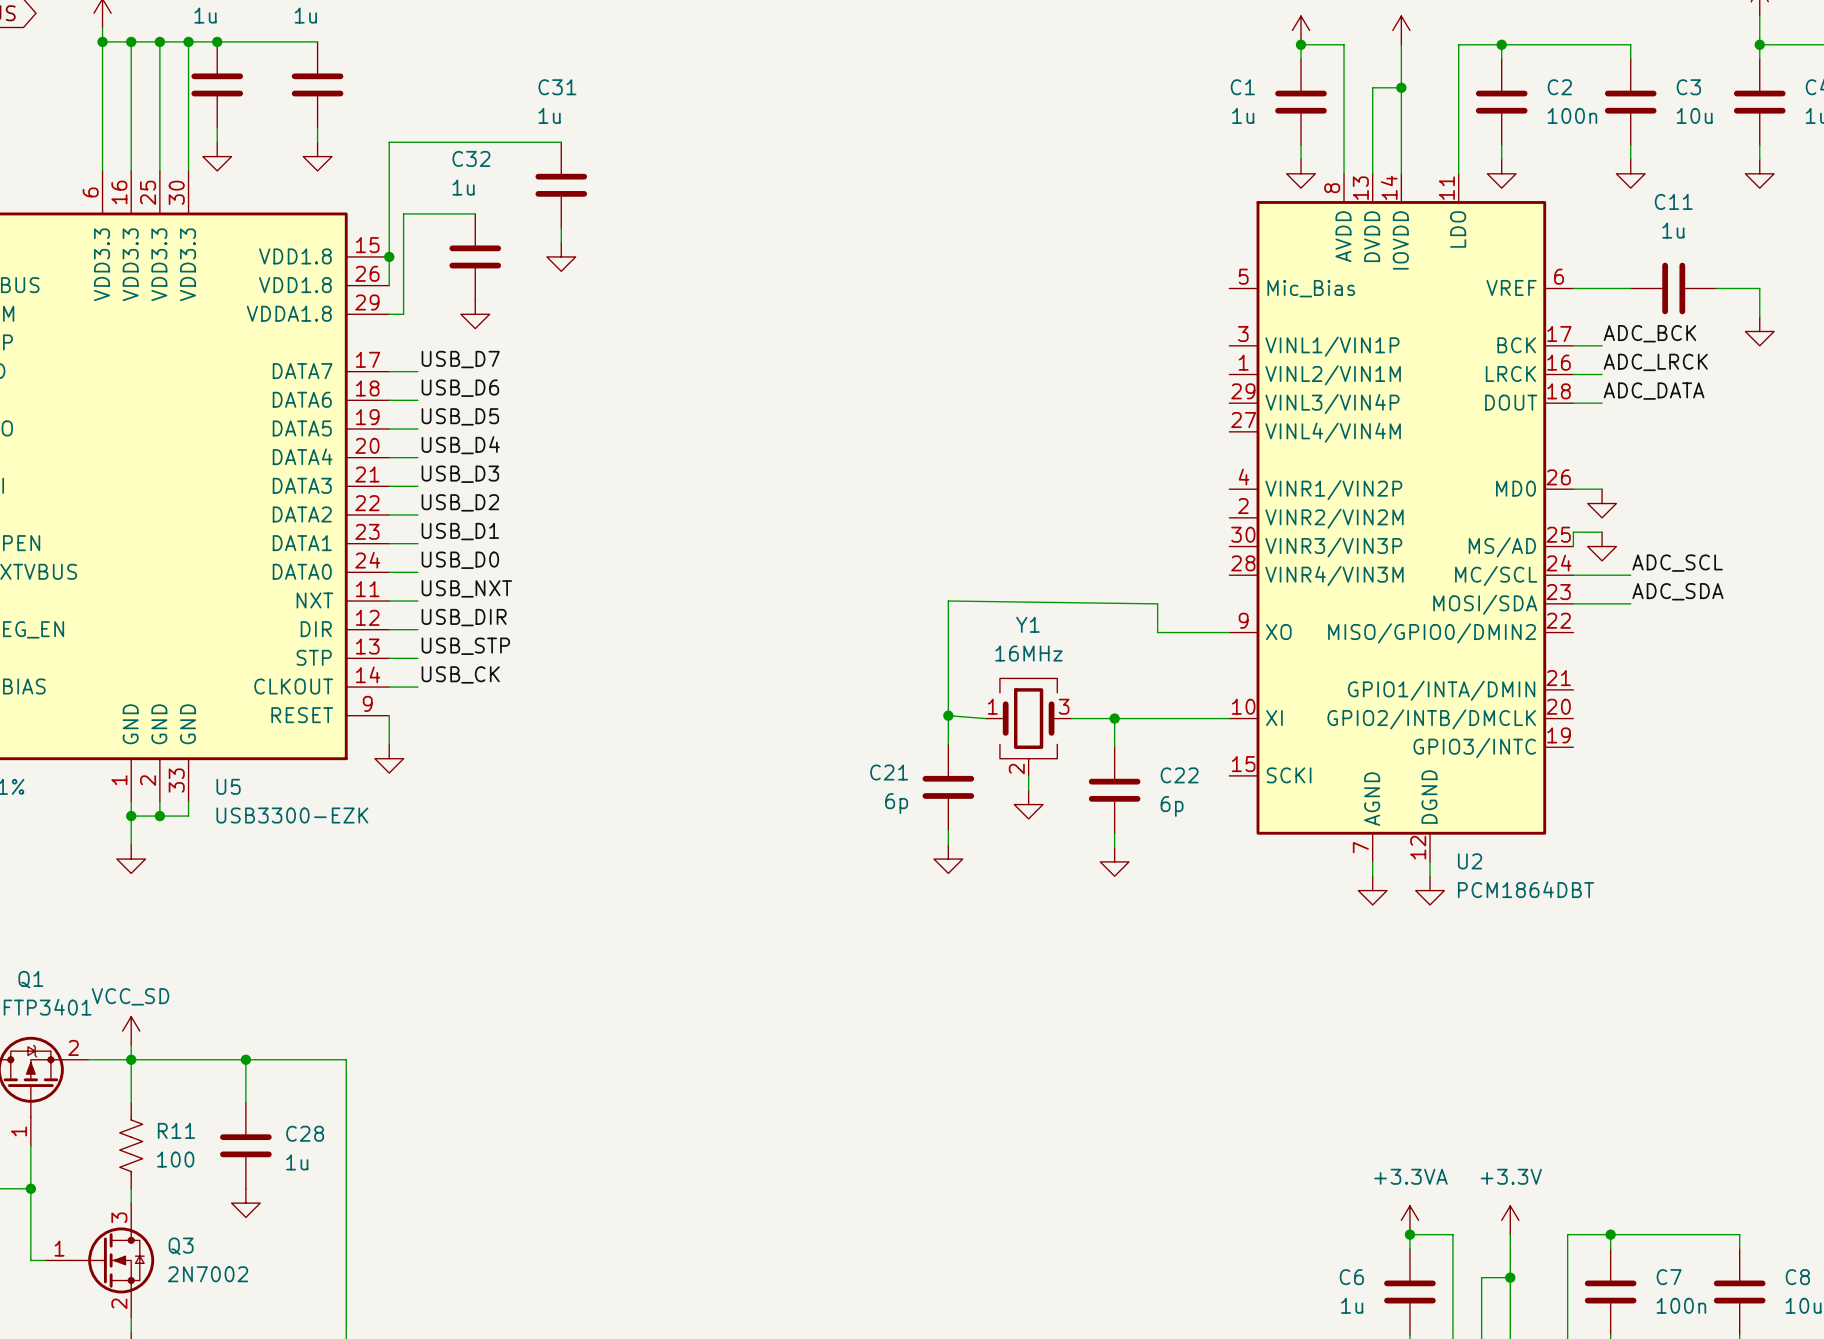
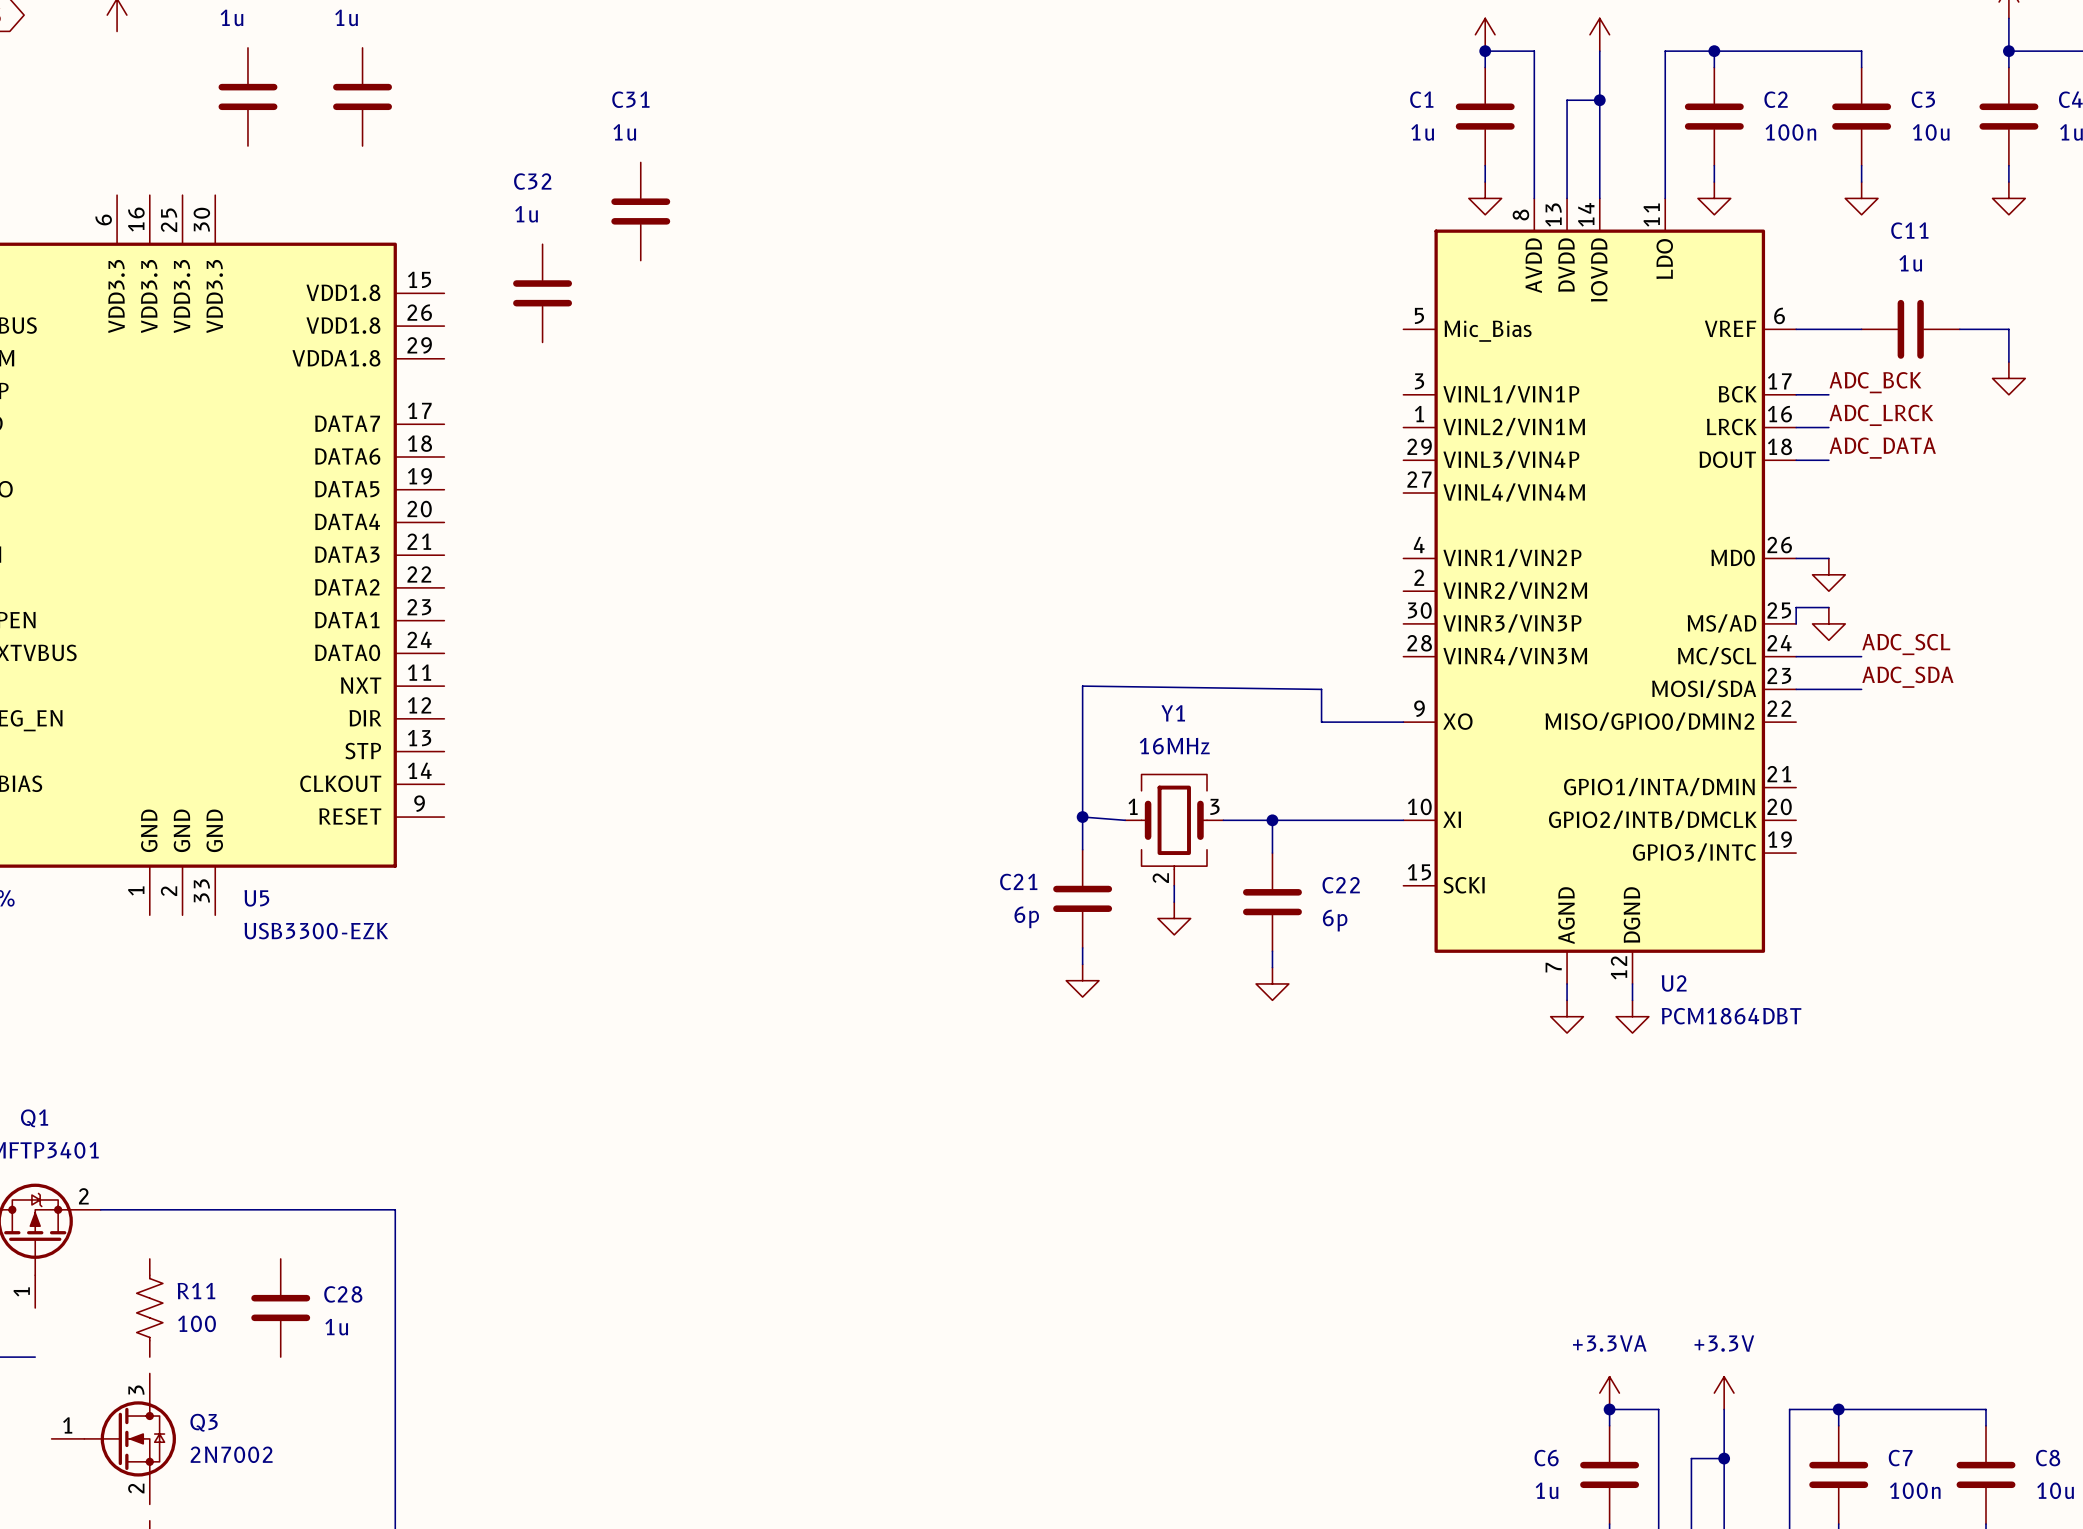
wire: (102, 27) (102, 170) -> none
wire: (102, 41) (317, 41) -> none
junction: (102, 41) -> none
wire: (131, 41) (131, 170) -> none
junction: (131, 41) -> none
wire: (159, 41) (159, 170) -> none
junction: (159, 41) -> none
wire: (188, 41) (188, 170) -> none
junction: (188, 41) -> none
junction: (217, 41) -> none
wire: (217, 127) (217, 142) -> none
wire: (317, 127) (317, 142) -> none
wire: (561, 142) (389, 142) (389, 285) -> none
power symbol: (217, 156) -> none
power symbol: (317, 156) -> none
wire: (475, 213) (403, 213) (403, 314) (389, 314) -> none
wire: (561, 228) (561, 242) -> none
junction: (389, 256) -> none
power symbol: (561, 256) -> none
power symbol: (475, 314) -> none
label: USB_D7 (460, 359) -> none
wire: (389, 371) (417, 371) -> none
label: USB_D6 (460, 388) -> none
wire: (389, 400) (417, 400) -> none
label: USB_D5 (460, 416) -> none
wire: (389, 428) (417, 428) -> none
label: USB_D4 (460, 445) -> none
wire: (389, 457) (417, 457) -> none
label: USB_D3 (460, 474) -> none
wire: (389, 486) (417, 486) -> none
label: USB_D2 (460, 502) -> none
wire: (389, 515) (417, 515) -> none
label: USB_D1 (460, 531) -> none
wire: (389, 543) (417, 543) -> none
label: USB_D0 (460, 560) -> none
wire: (389, 572) (417, 572) -> none
label: USB_NXT (466, 588) -> none
wire: (389, 601) (417, 601) -> none
label: USB_DIR (464, 617) -> none
wire: (389, 629) (417, 629) -> none
label: USB_STP (465, 646) -> none
wire: (389, 658) (417, 658) -> none
label: USB_CK (460, 674) -> none
wire: (389, 687) (417, 687) -> none
wire: (389, 715) (389, 744) -> none
power symbol: (389, 758) -> none
wire: (131, 801) (131, 844) -> none
wire: (159, 801) (159, 816) -> none
wire: (188, 801) (188, 816) (131, 816) -> none
junction: (131, 816) -> none
junction: (159, 816) -> none
power symbol: (131, 859) -> none
power symbol: VCC_SD (131, 1031) -> none
wire: (131, 1045) (131, 1102) -> none
junction: (131, 1059) -> none
wire: (245, 1059) (245, 1102) -> none
junction: (245, 1059) -> none
wire: (30, 1145) (30, 1260) (45, 1260) -> none
junction: (30, 1188) -> none
wire: (131, 1188) (131, 1203) -> none
power symbol: (245, 1203) -> none
wire: (131, 1317) (131, 1332) -> none

